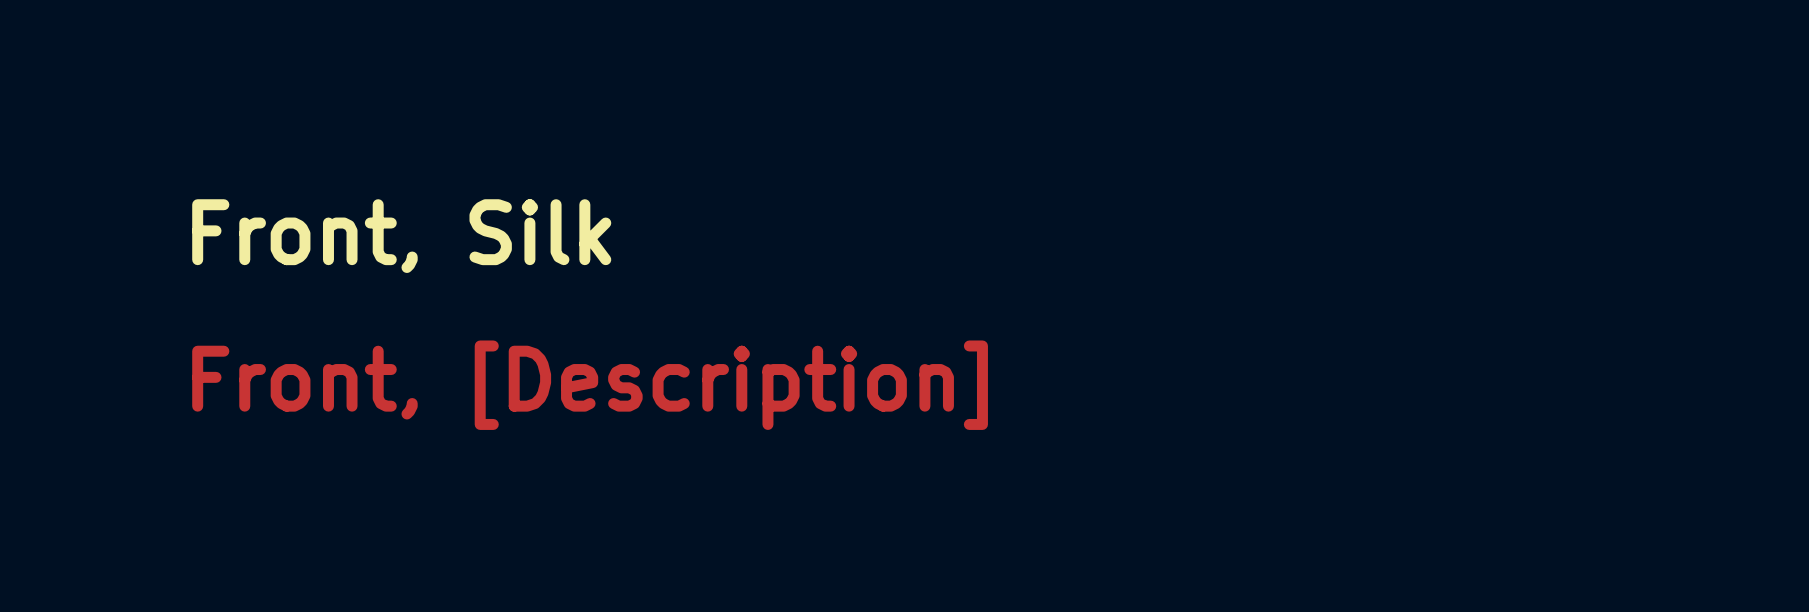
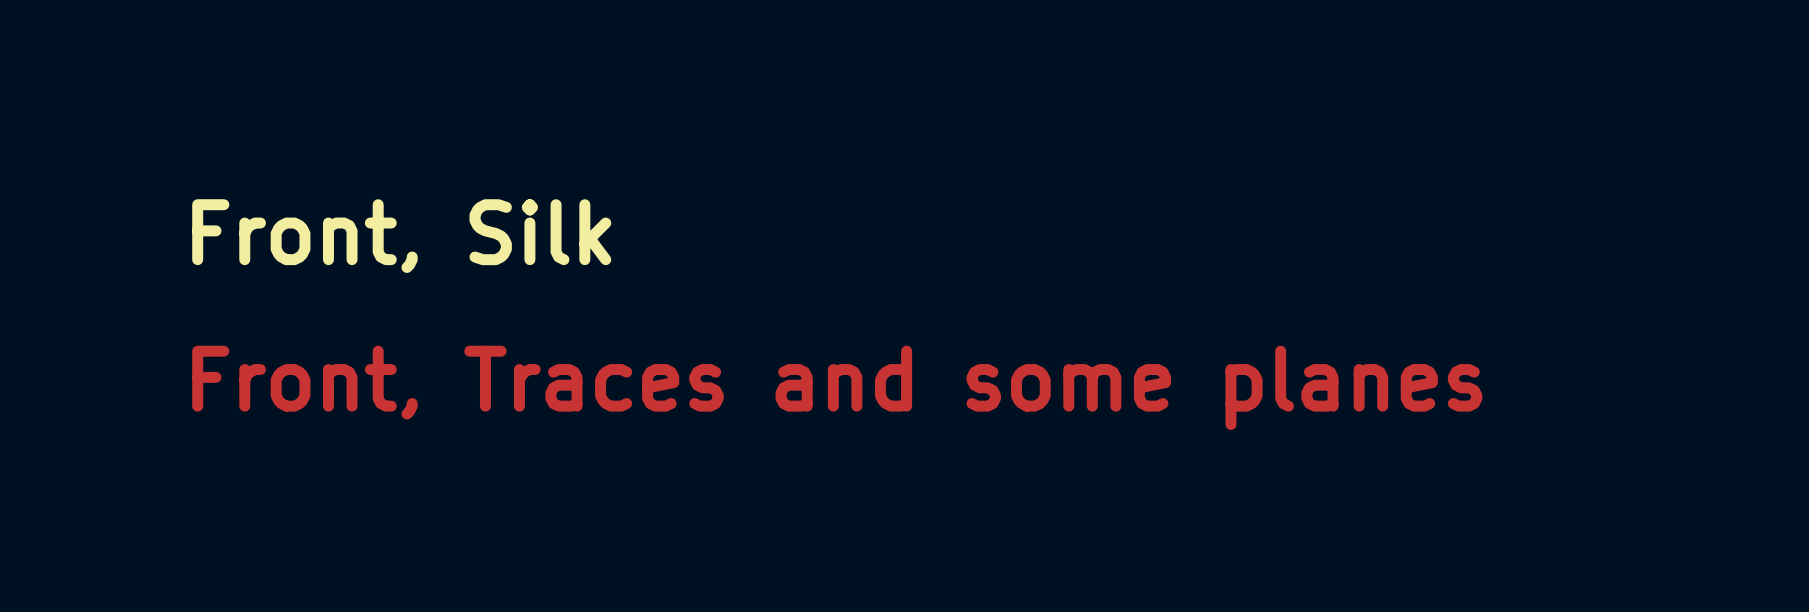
text: Front, [Description] (590, 385) -> Front, Traces and some planes (837, 387)

